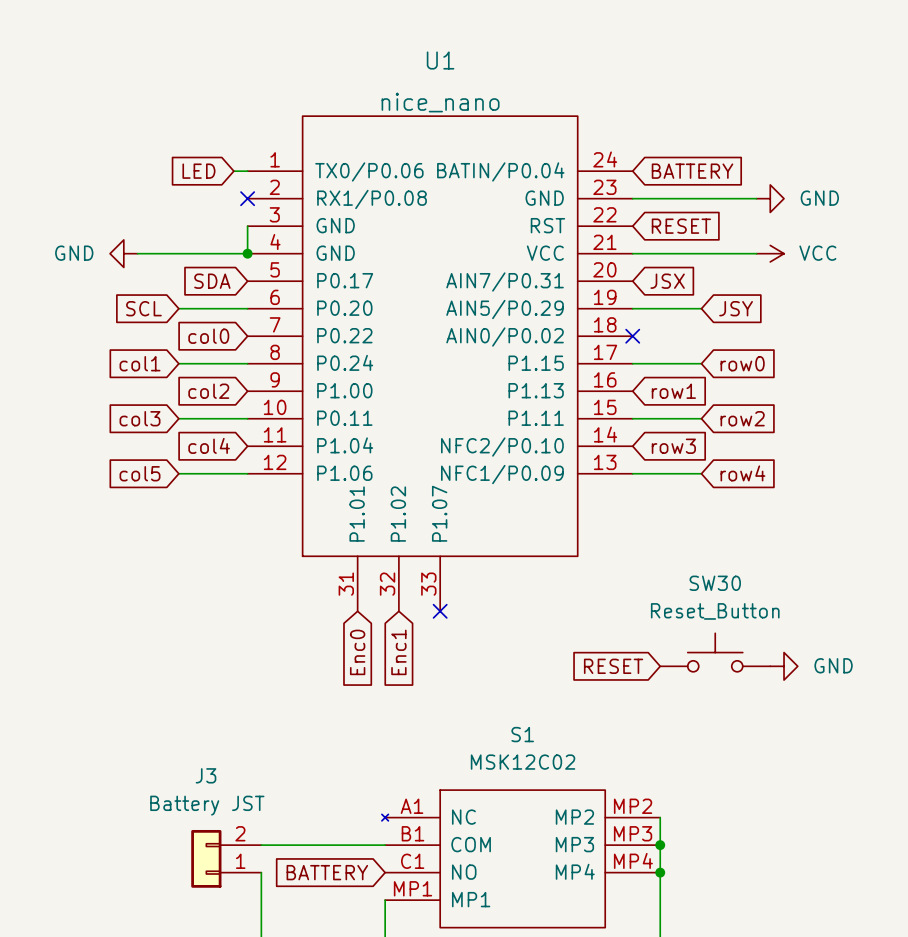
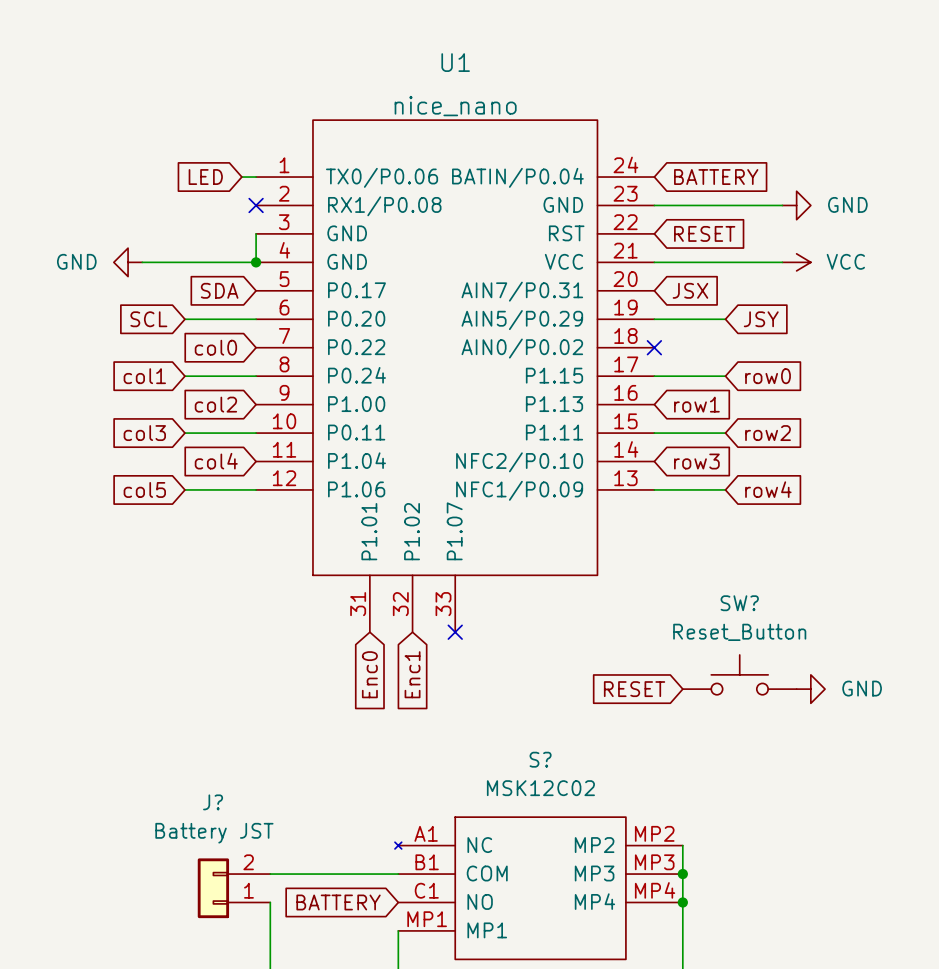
SW30 name: SW30 (715, 583) -> SW? (739, 603)
S1 name: S1 (522, 734) -> S? (540, 759)
J3 name: J3 (206, 775) -> J? (213, 802)

